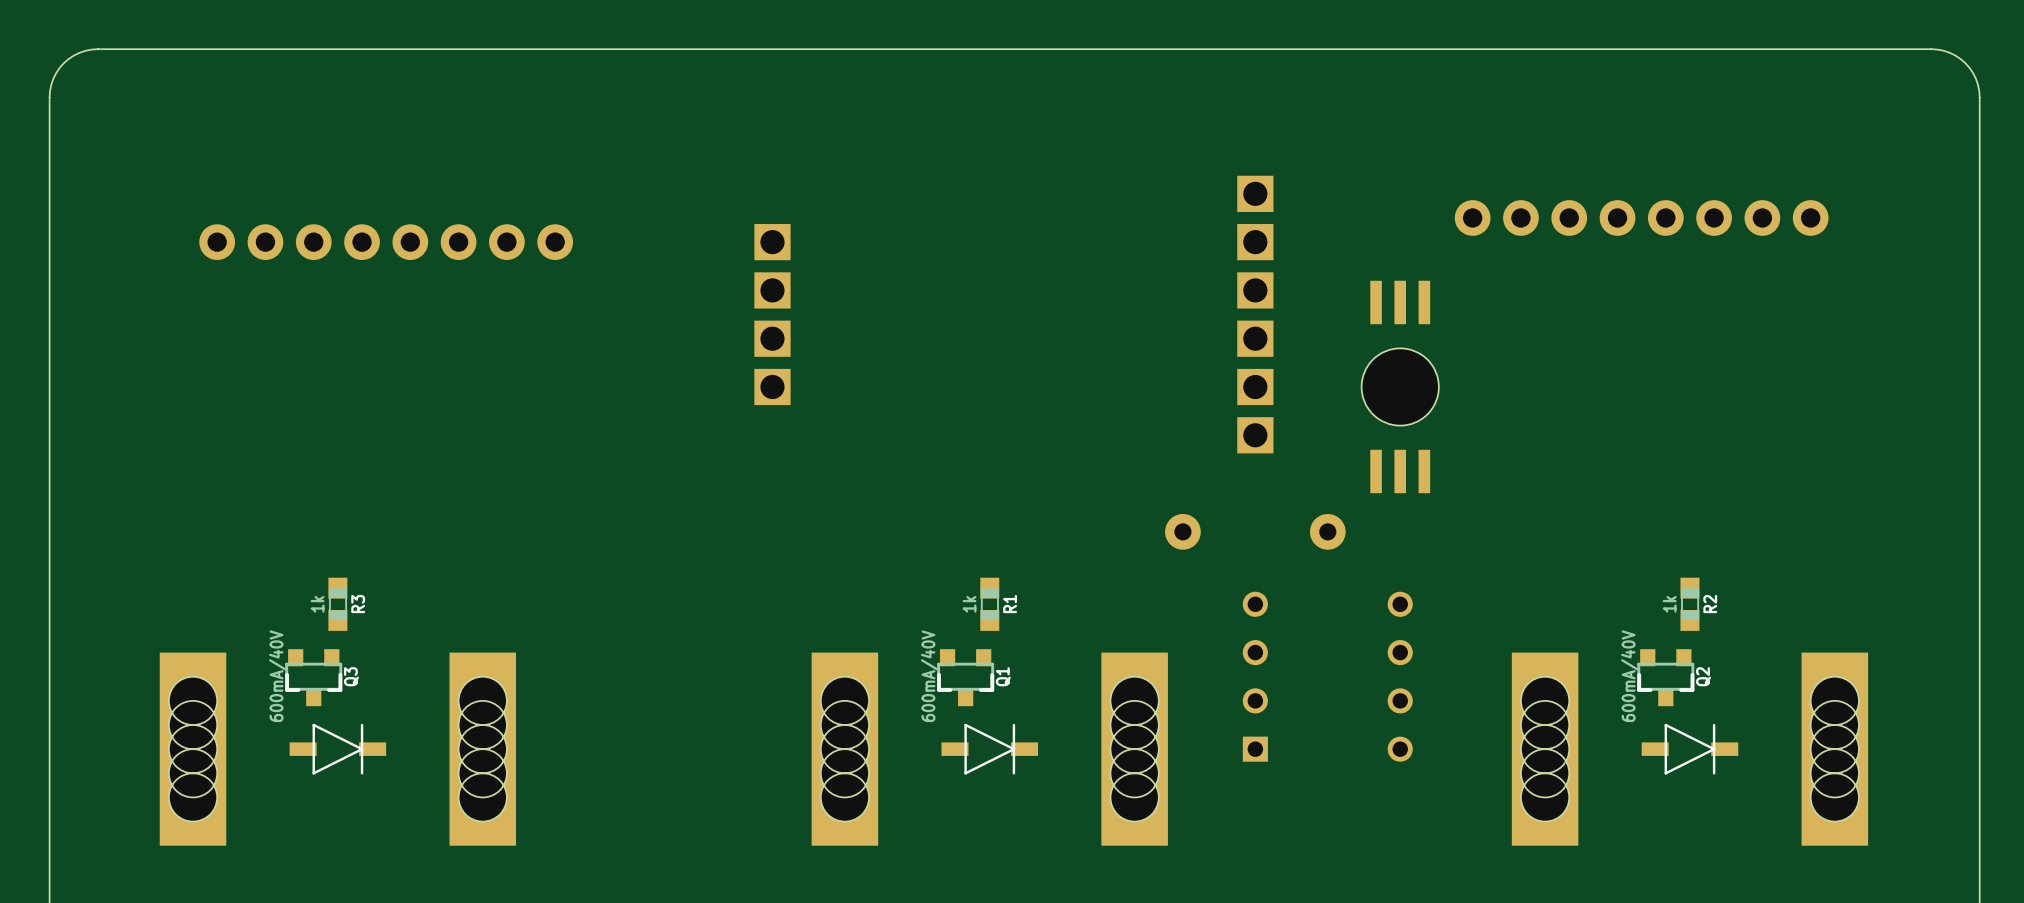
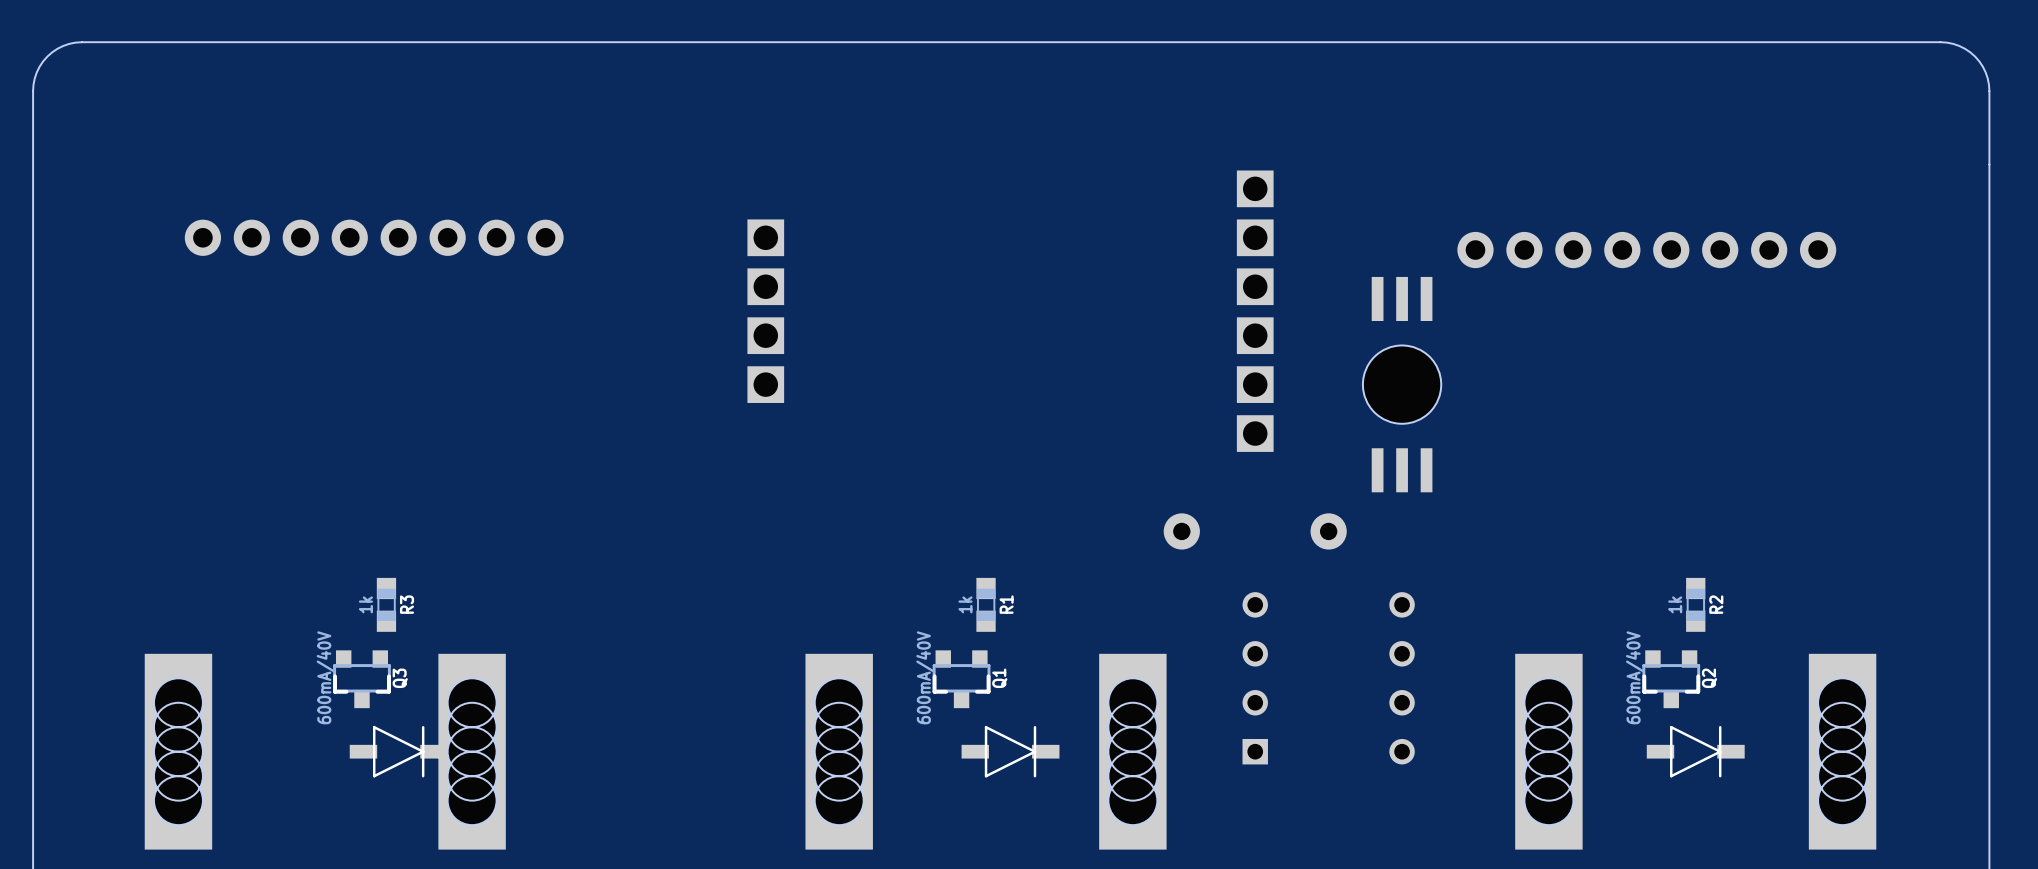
part position: (1641, 217) -> (1646, 250)
R3 position: (337, 604) -> (386, 604)
Q3 position: (313, 677) -> (361, 679)
part position: (337, 749) -> (398, 751)
part position: (989, 749) -> (1010, 751)

